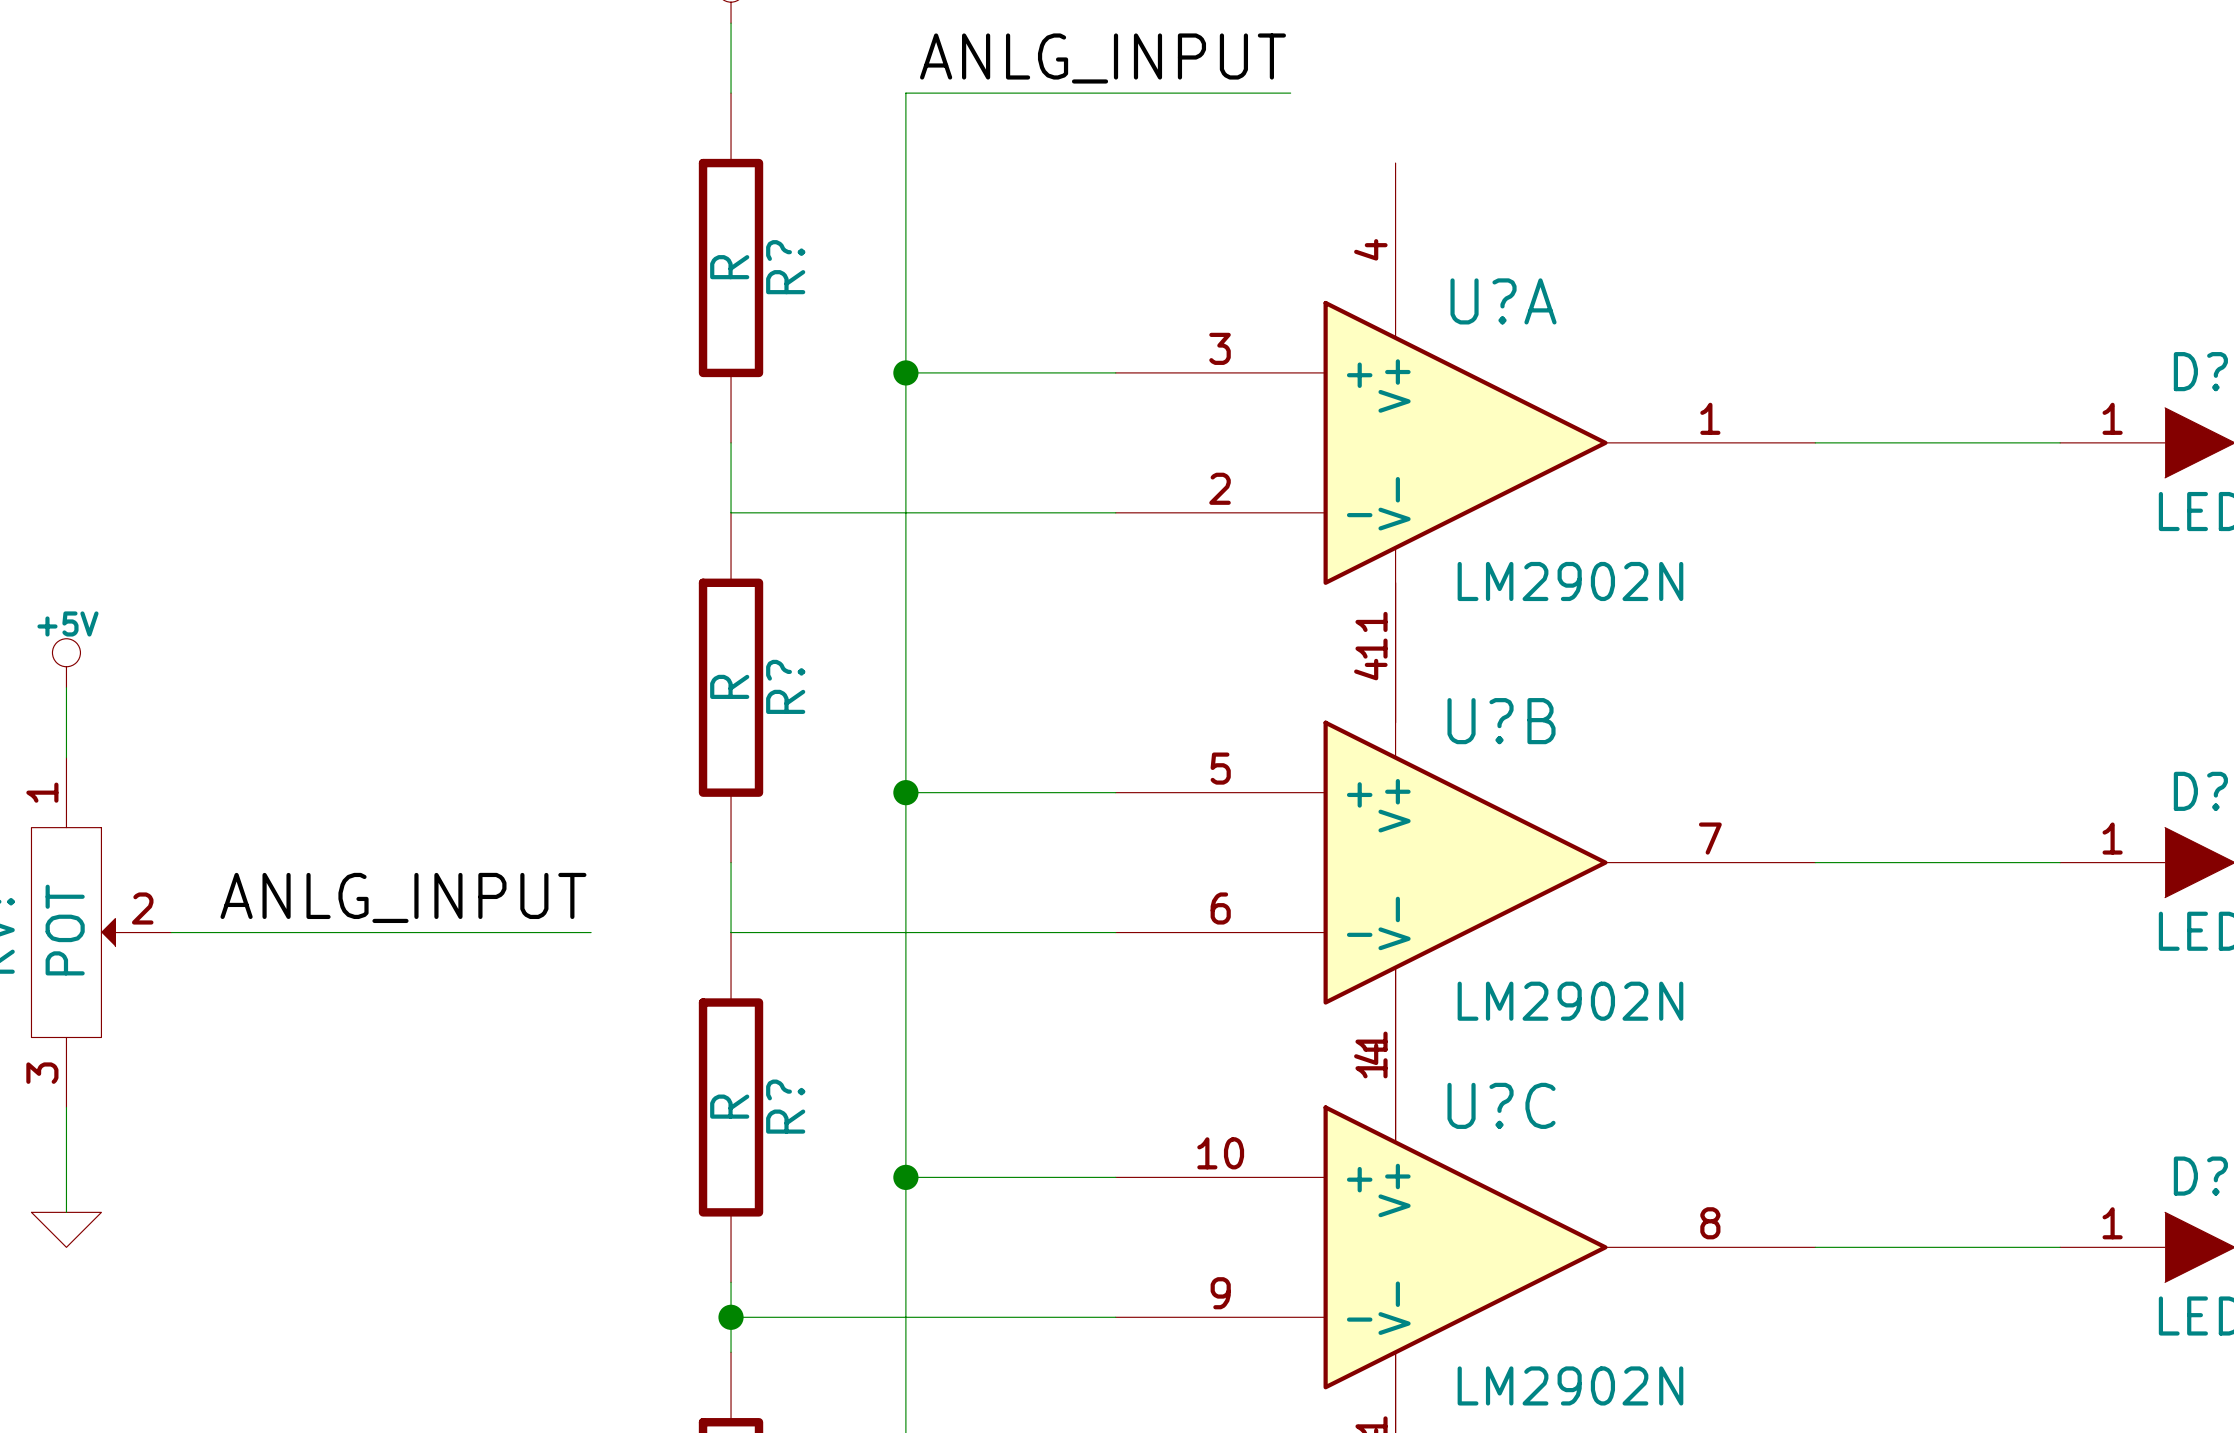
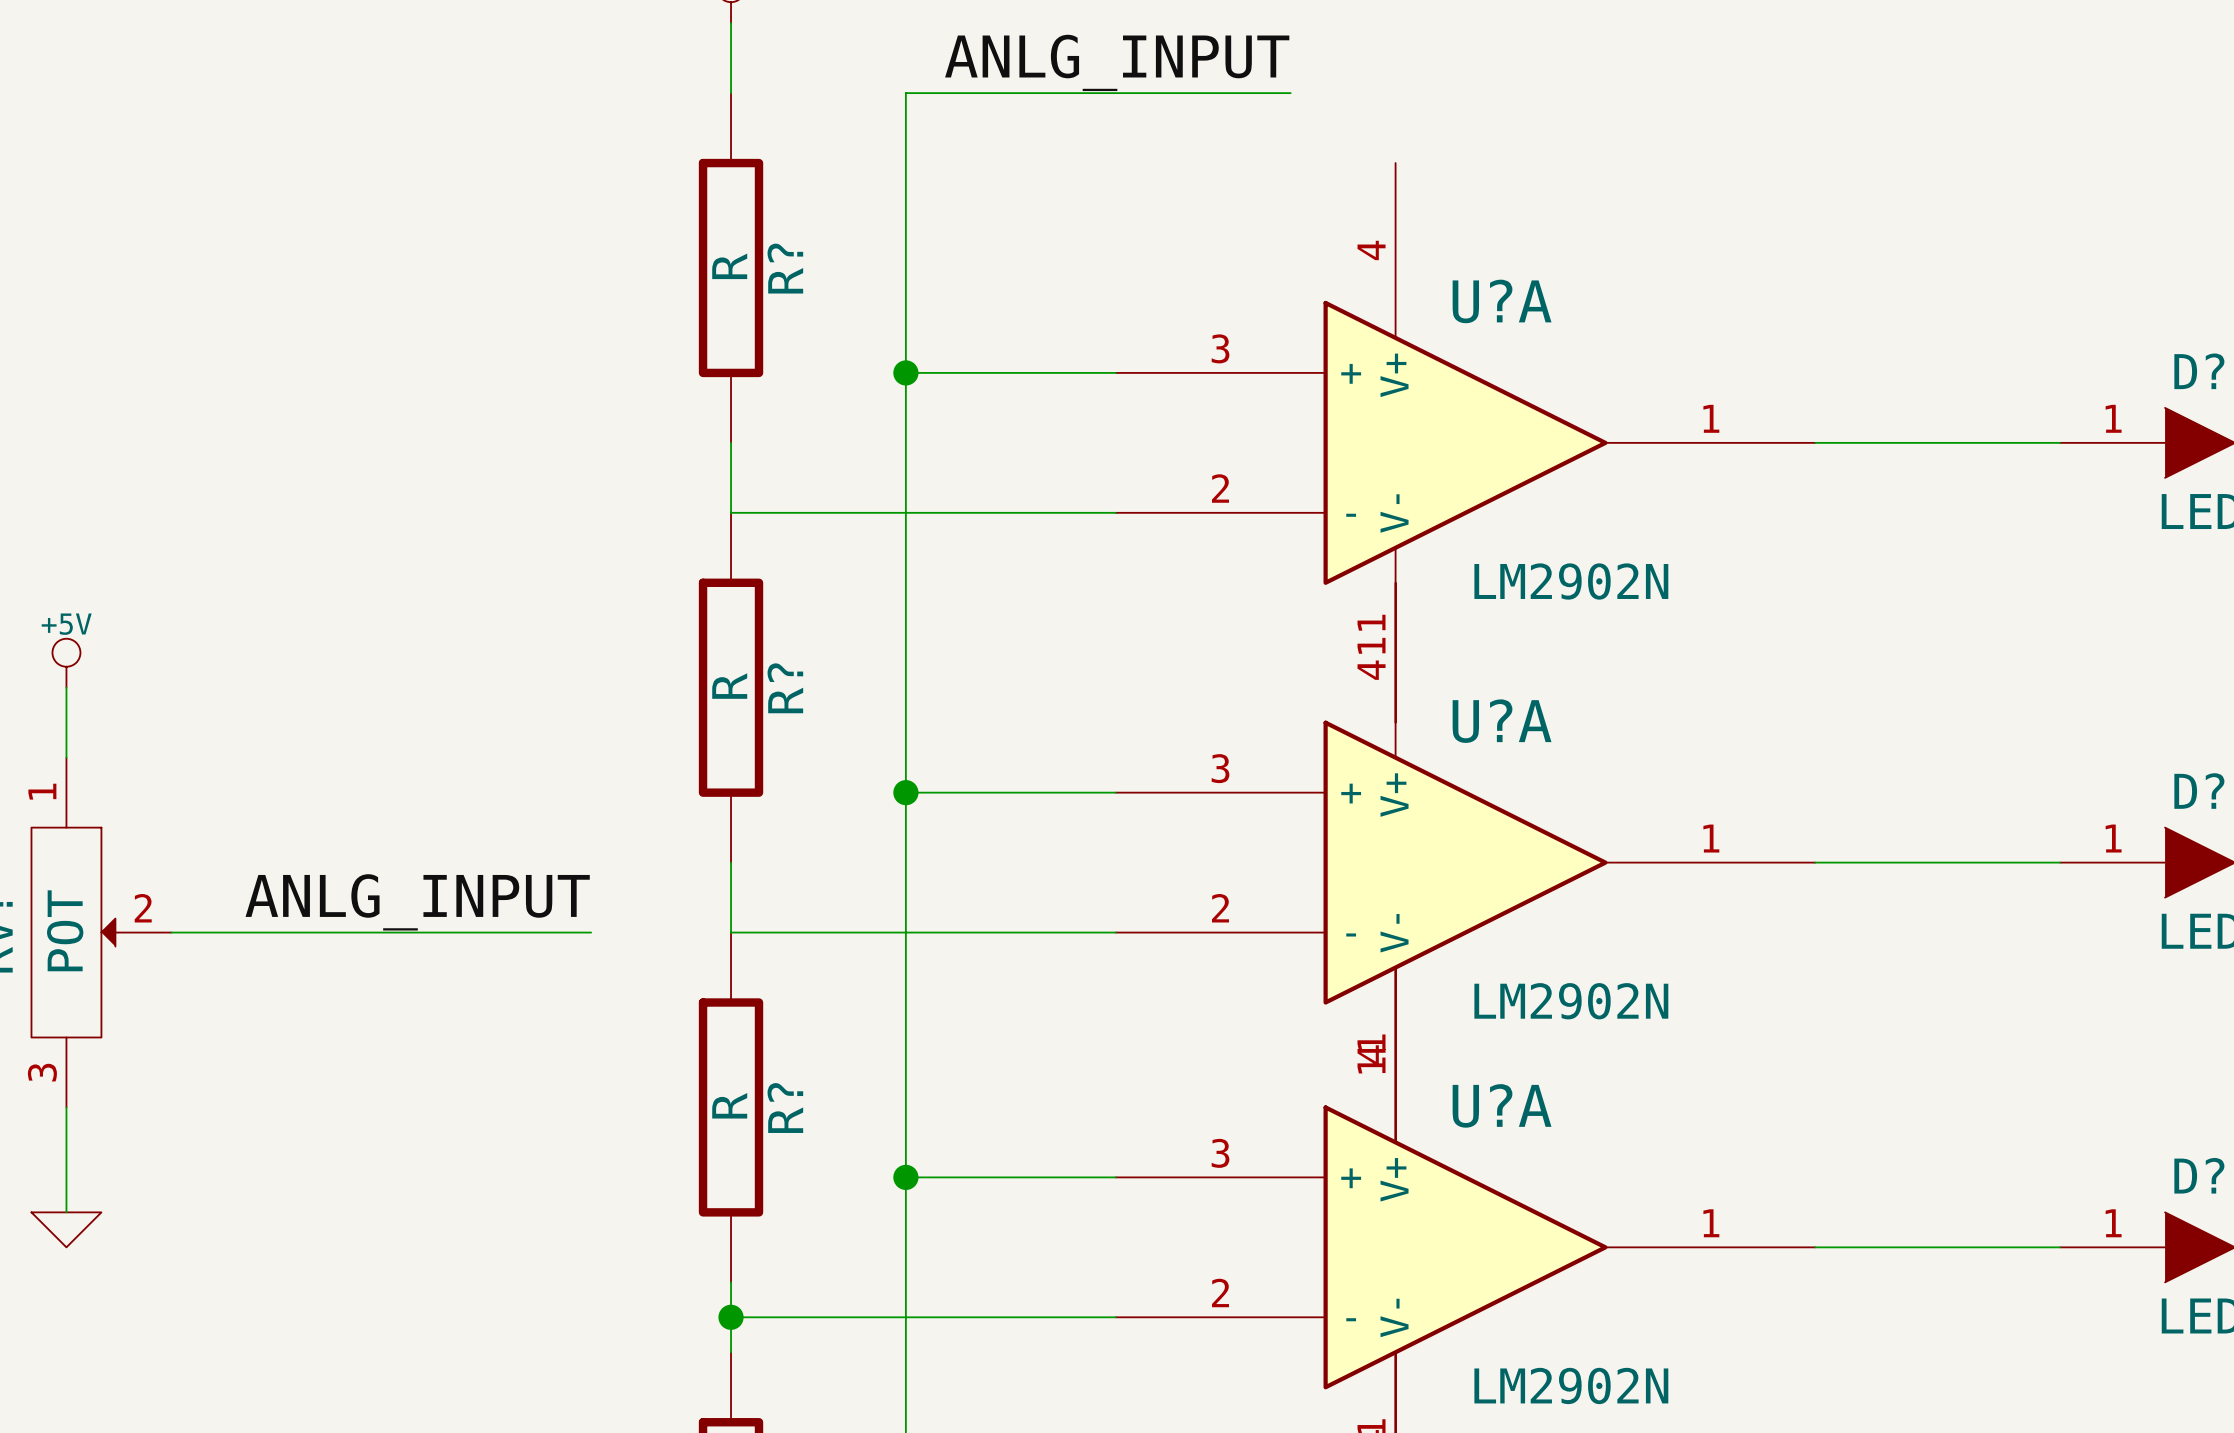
U?B name: U?B (1501, 721) -> U?A (1502, 721)
U?B pin number: 5 (1220, 768) -> 3 (1220, 768)
U?B pin number: 7 (1710, 838) -> 1 (1711, 838)
U?B pin number: 6 (1220, 908) -> 2 (1220, 908)
U?C name: U?C (1501, 1105) -> U?A (1502, 1105)
U?C pin number: 10 (1220, 1153) -> 3 (1220, 1153)
U?C pin number: 8 (1710, 1223) -> 1 (1711, 1223)
U?C pin number: 9 (1220, 1293) -> 2 (1220, 1292)

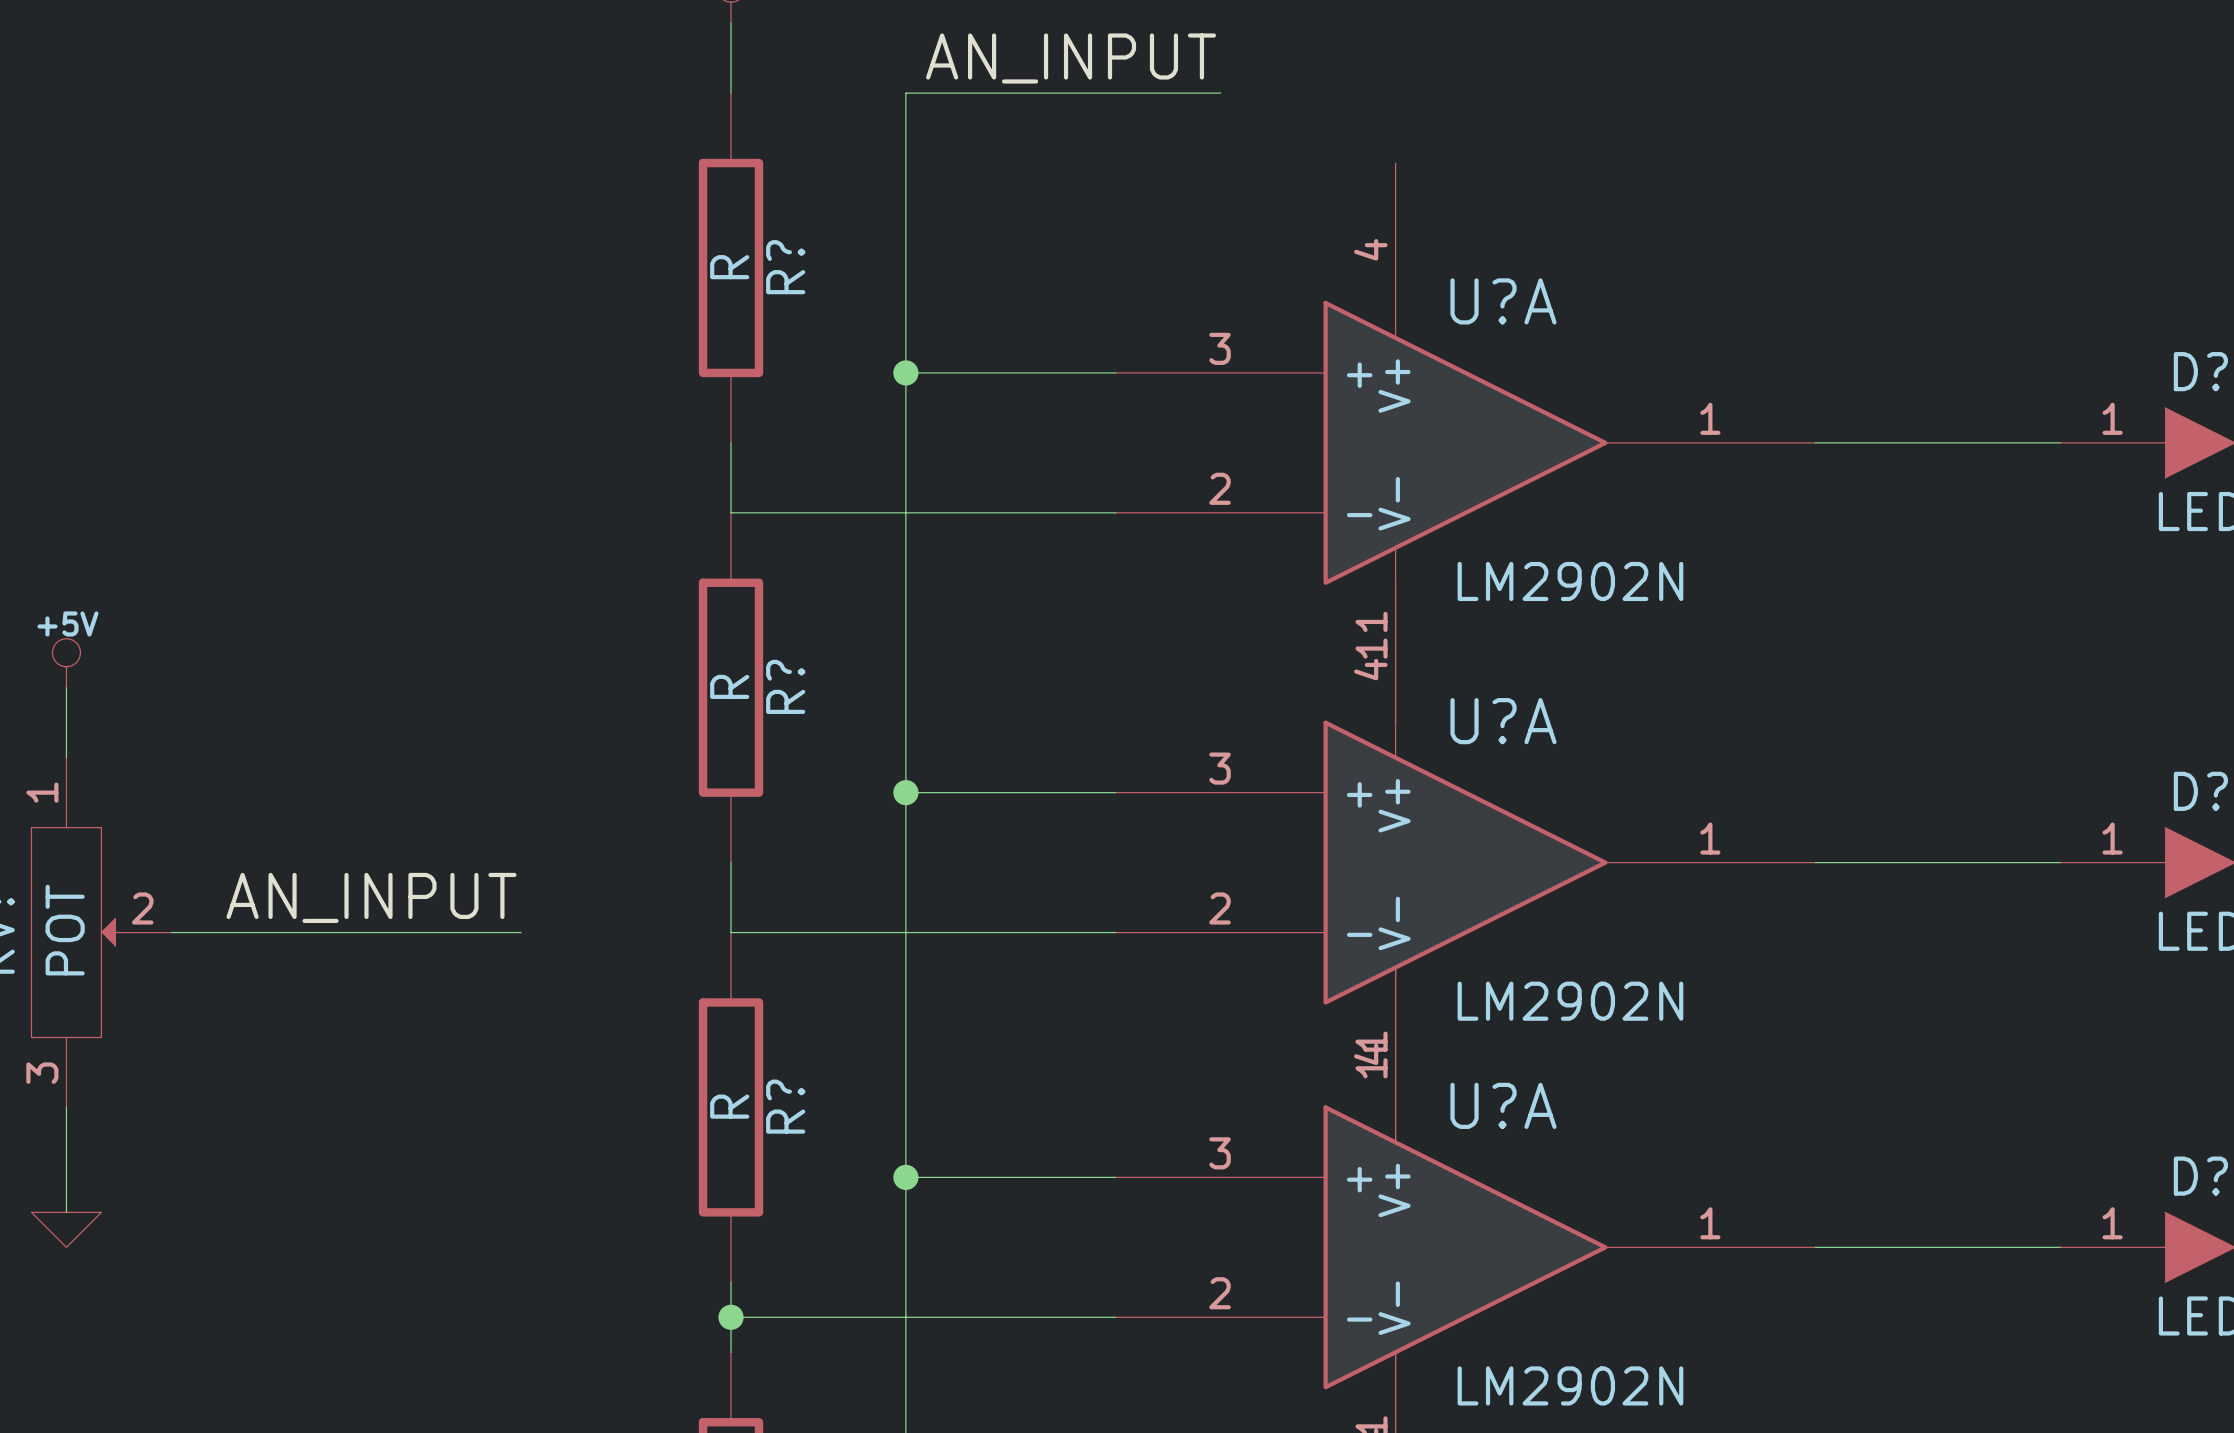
label: ANLG_INPUT (1117, 62) -> AN_INPUT (1071, 58)
wire: (1220, 93) (1290, 93) -> none
label: ANLG_INPUT (417, 902) -> AN_INPUT (371, 897)
wire: (521, 932) (591, 932) -> none

